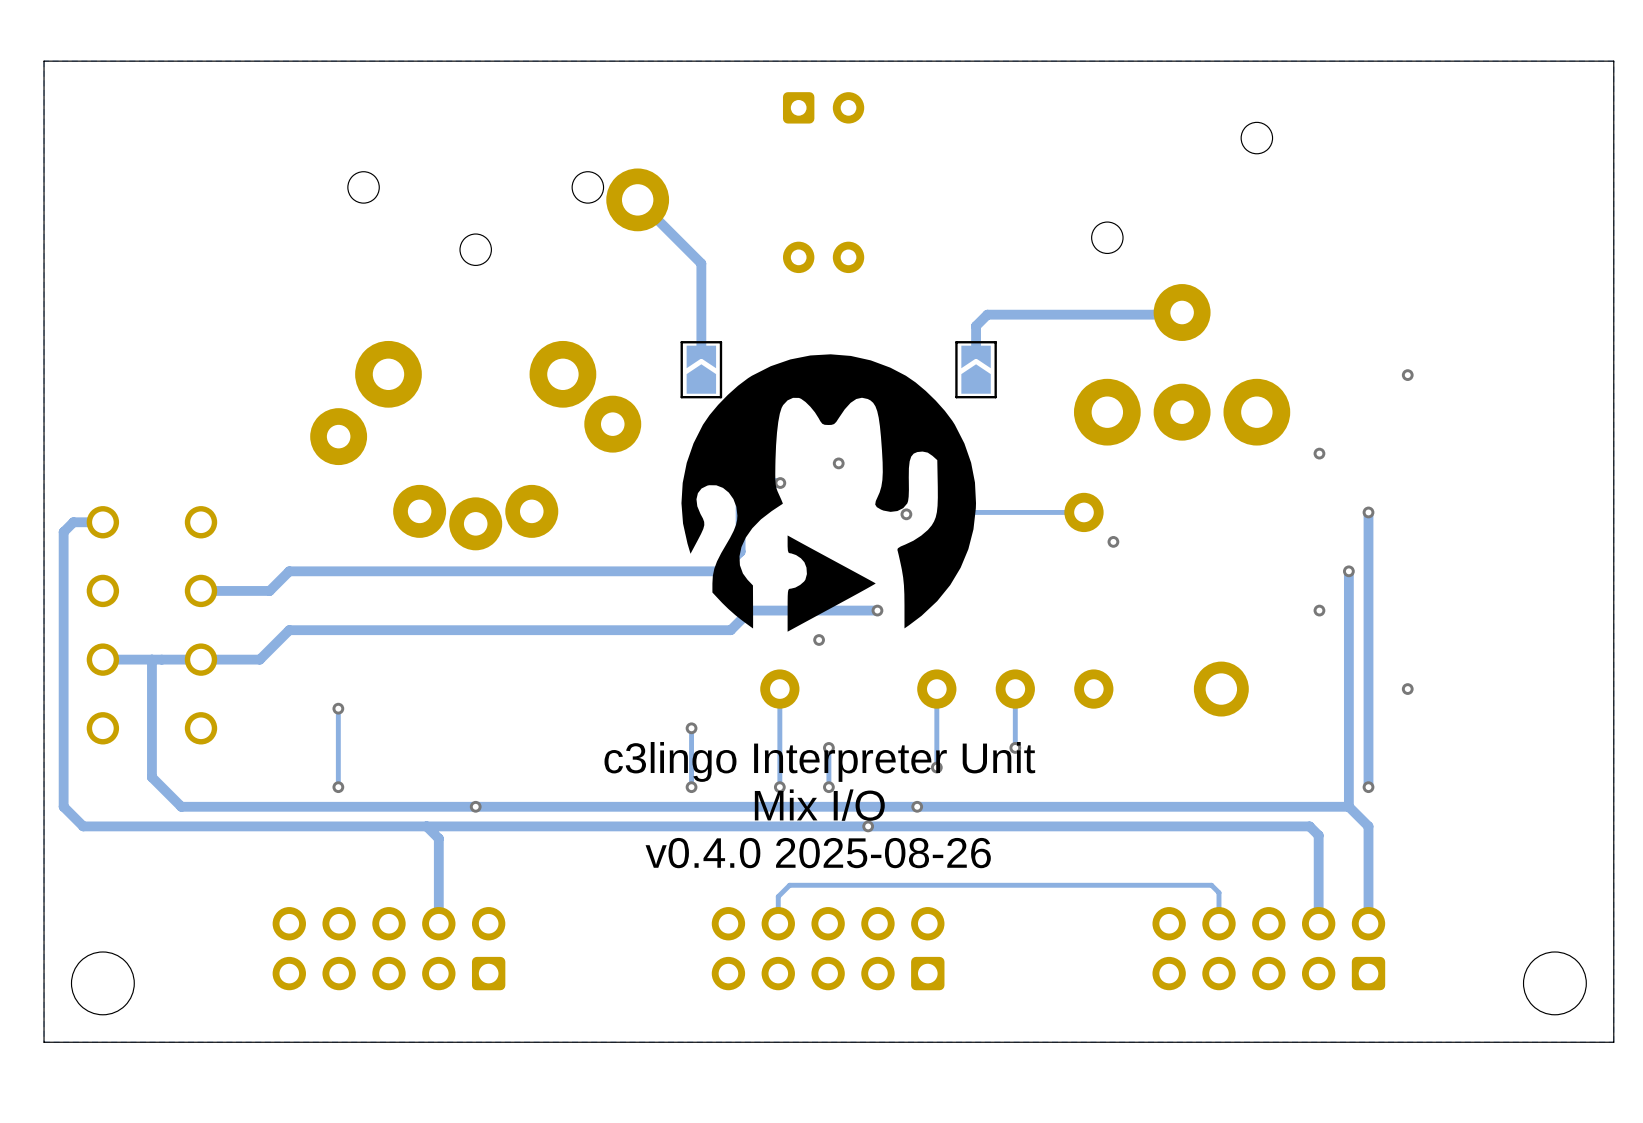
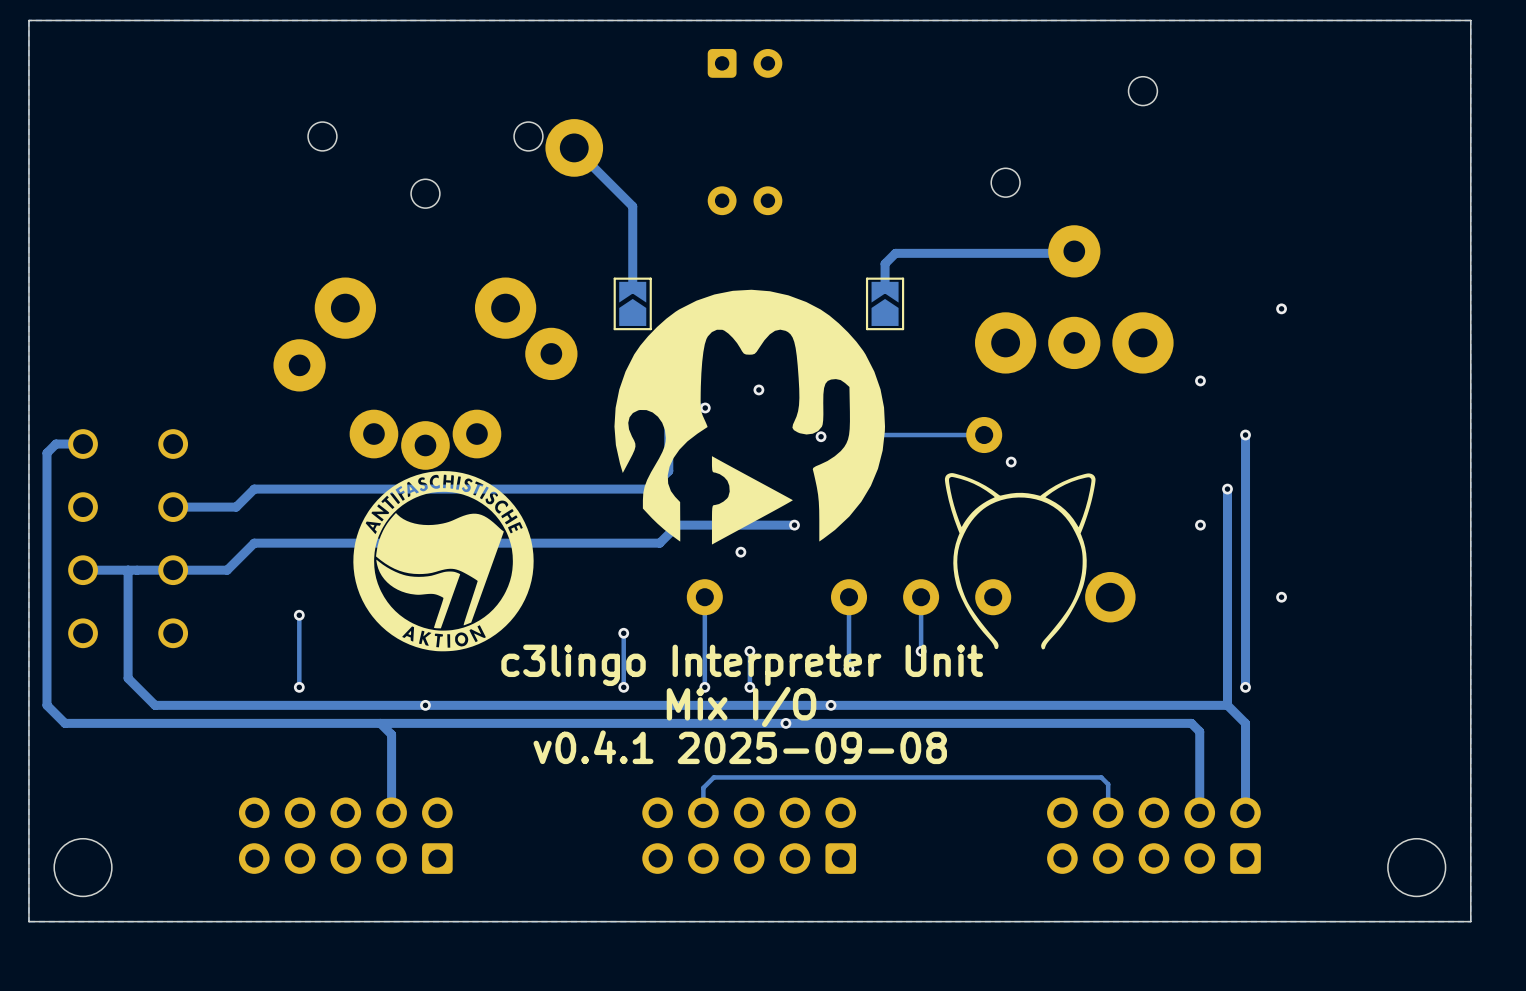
drawing: none -> [353, 471, 534, 652]
drawing: none -> [944, 473, 1096, 650]
text: v0.4.0 2025-08-26 (818, 853) -> v0.4.1 2025-09-08 (740, 747)

